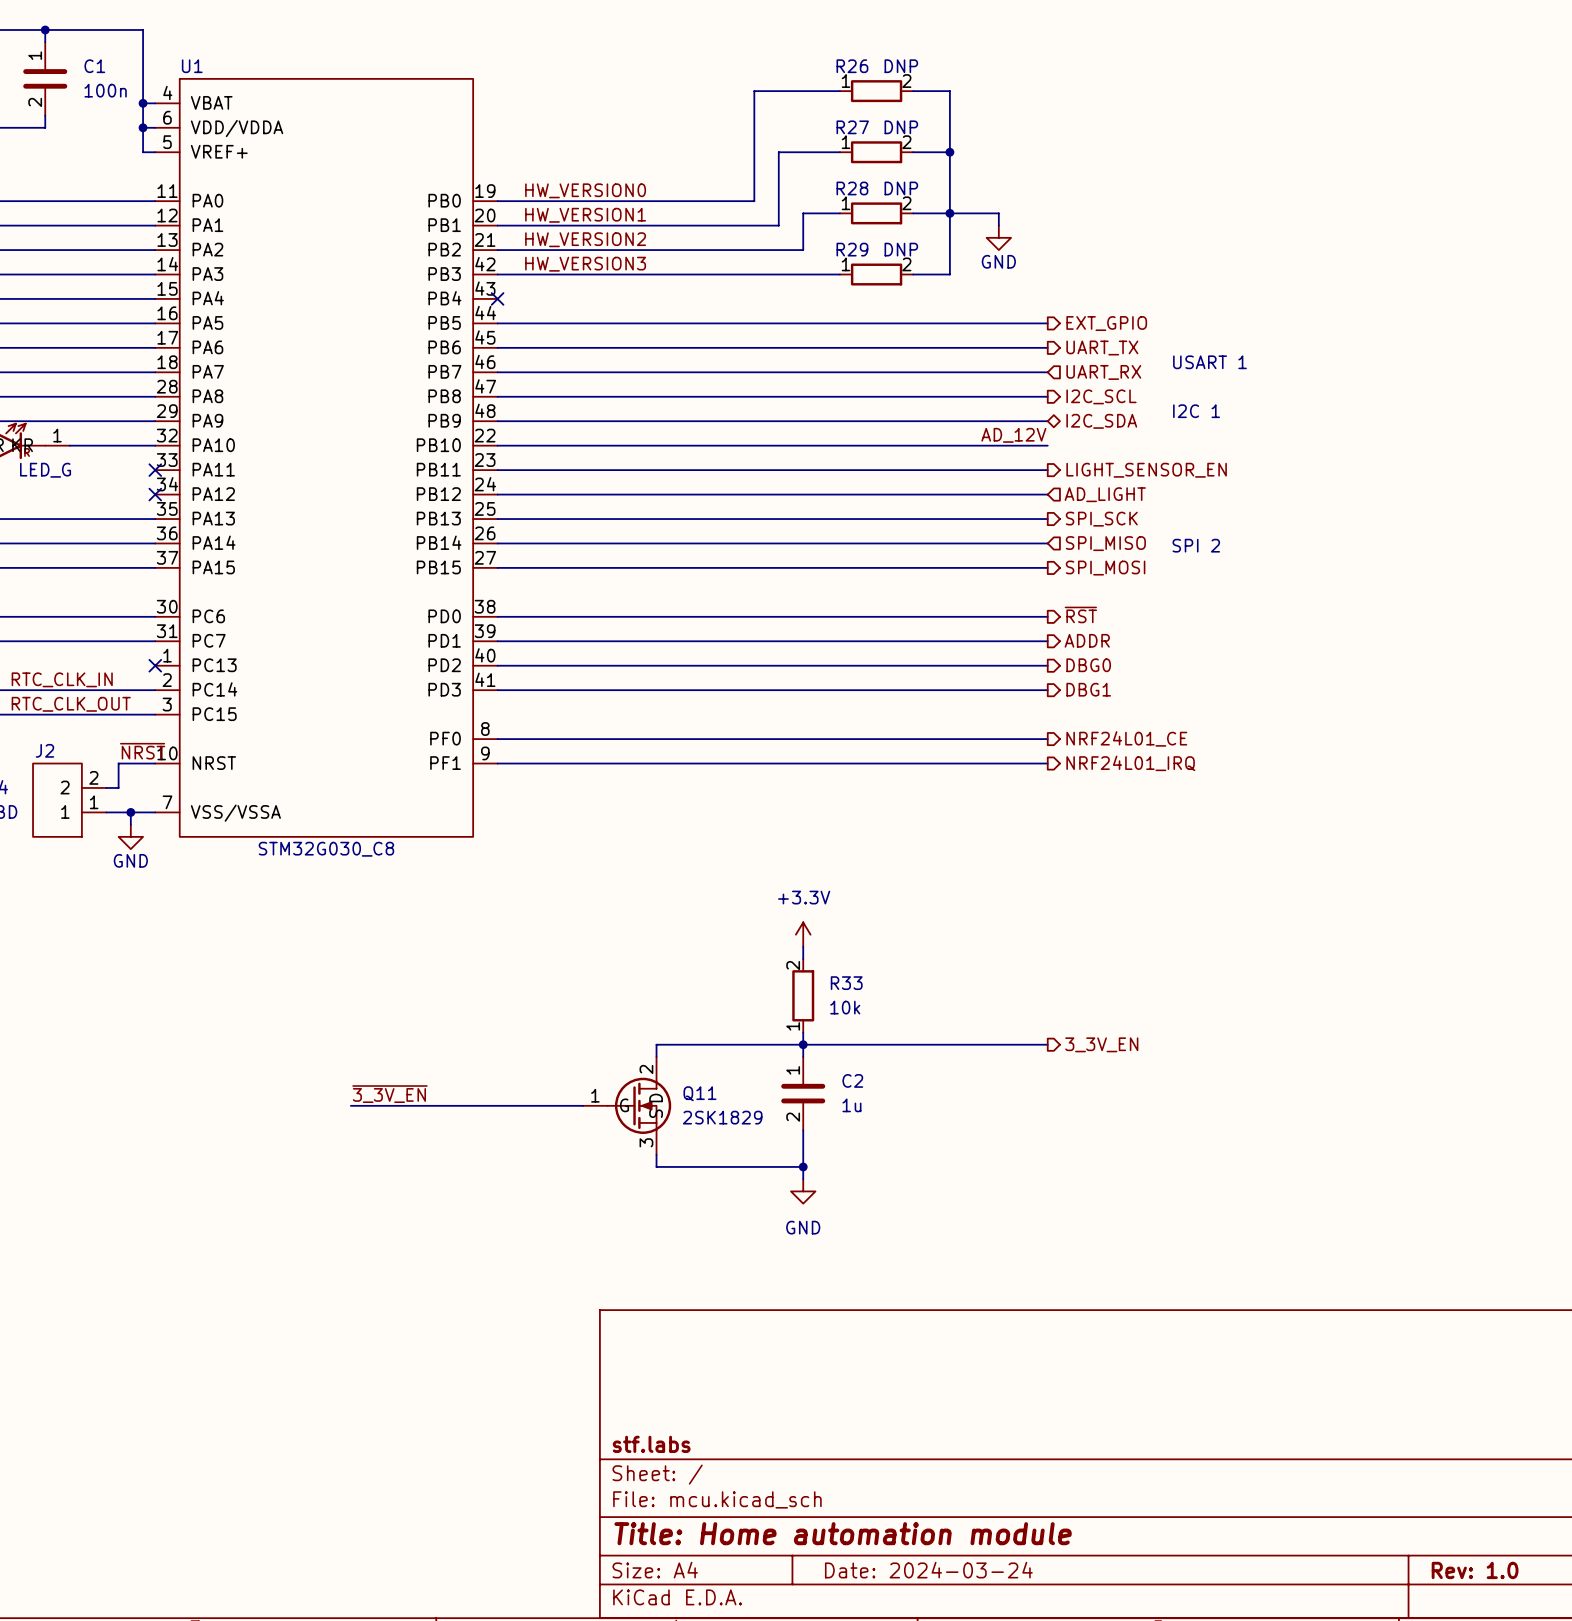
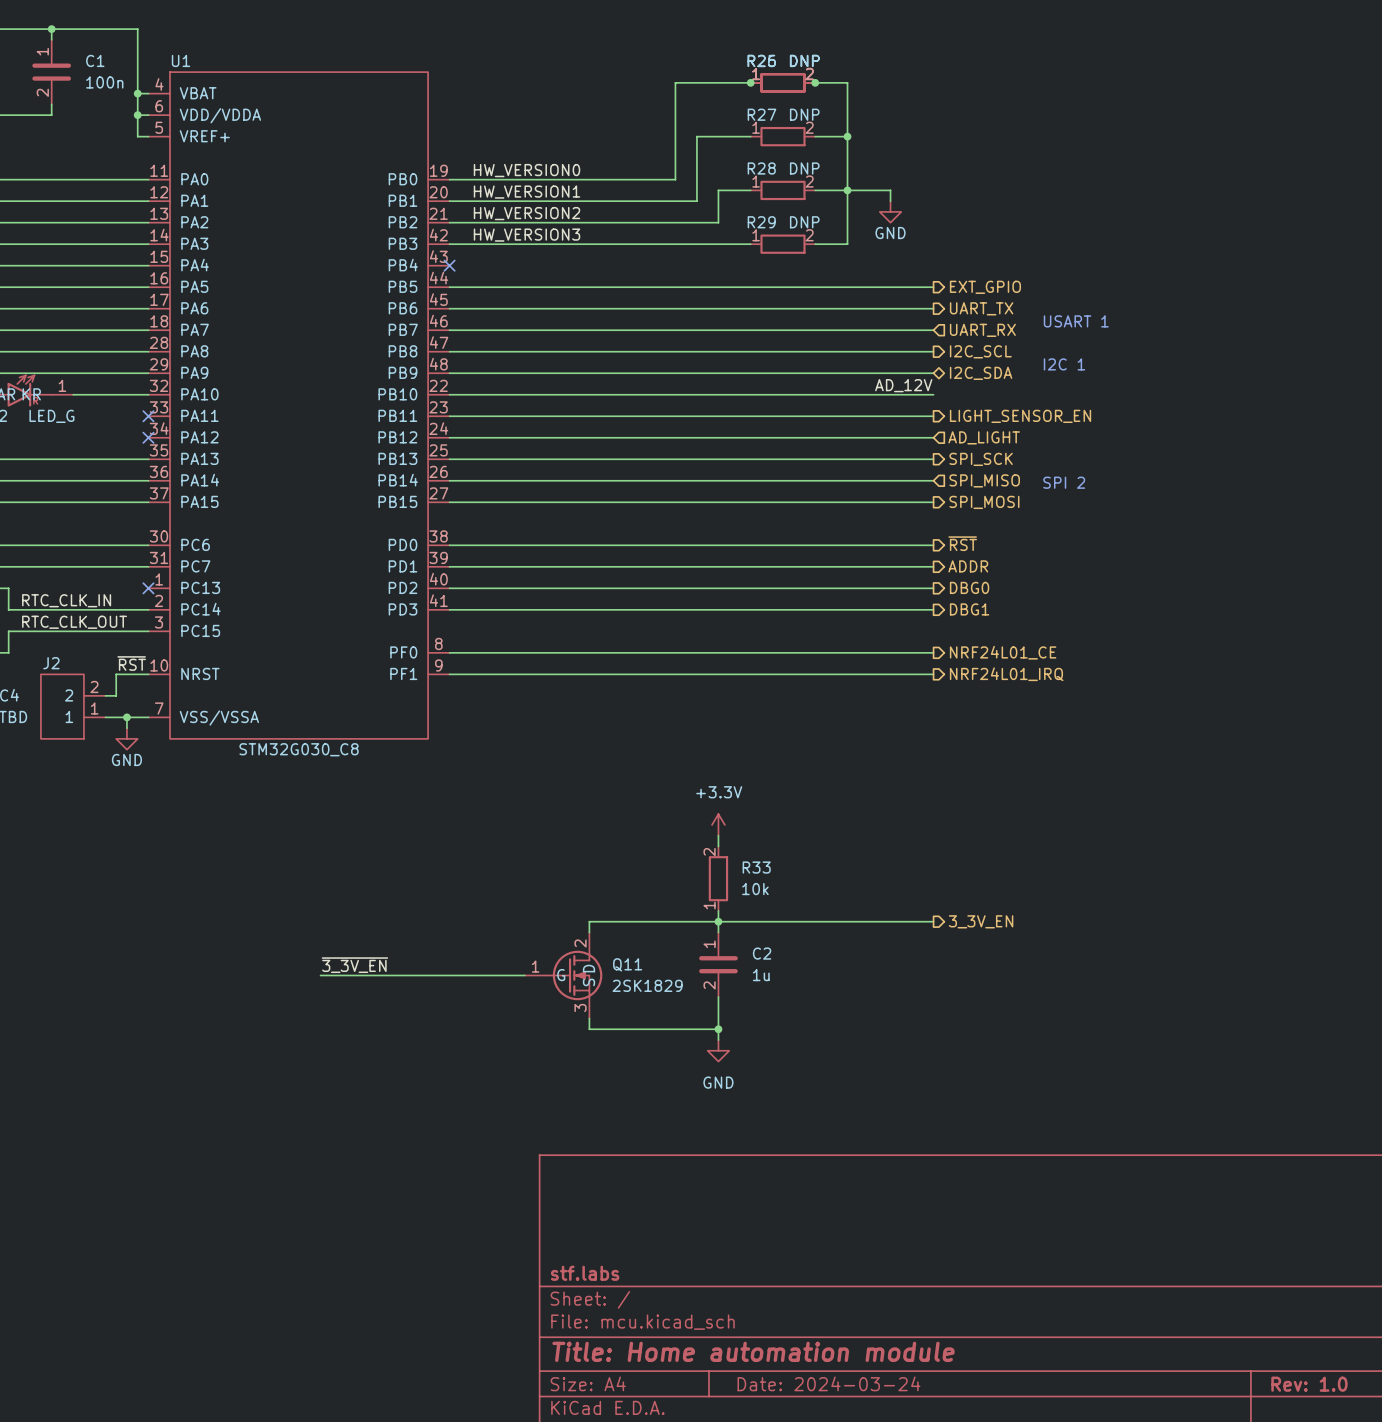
junction: none -> (750, 82)
part: none -> DNP (782, 82)
junction: none -> (815, 82)
label: ~{NRST} (142, 751) -> ~{RST} (131, 663)

